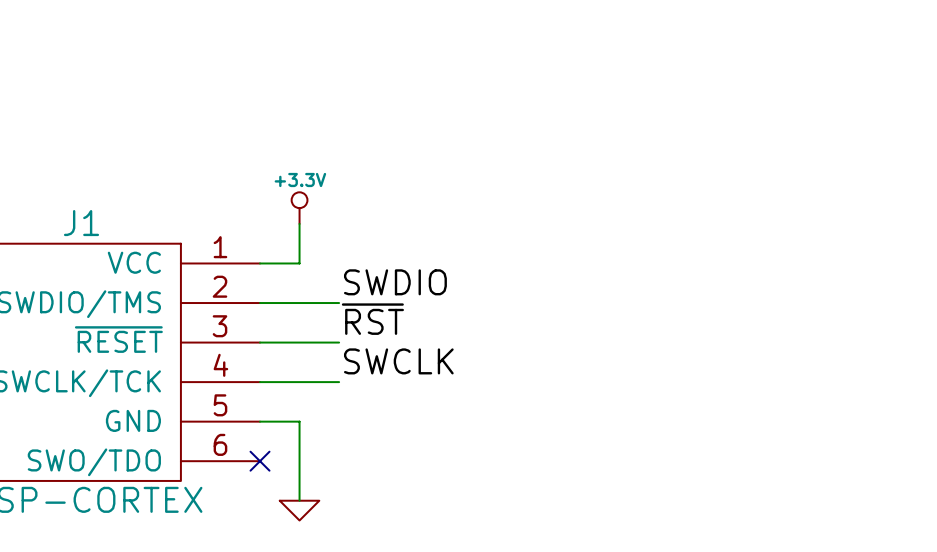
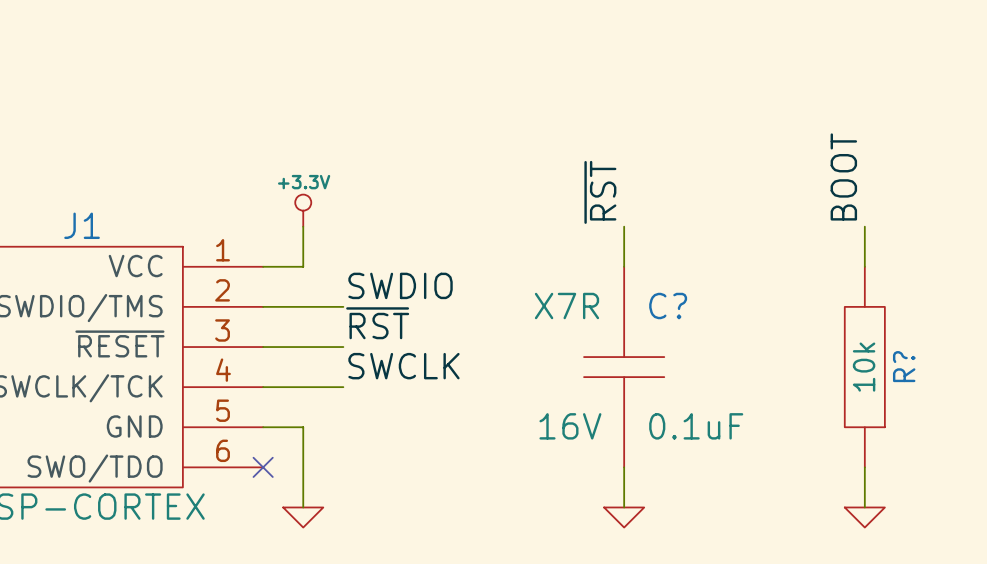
label: none -> BOOT (843, 176)
label: none -> ~{RST} (600, 192)
wire: none -> (624, 226) (624, 266)
wire: none -> (864, 226) (864, 266)
C?: none -> 0.1uF (624, 367)
R?: none -> 10k (864, 367)
wire: none -> (624, 467) (624, 507)
wire: none -> (864, 467) (864, 507)
power symbol: none -> (624, 517)
power symbol: none -> (864, 517)

